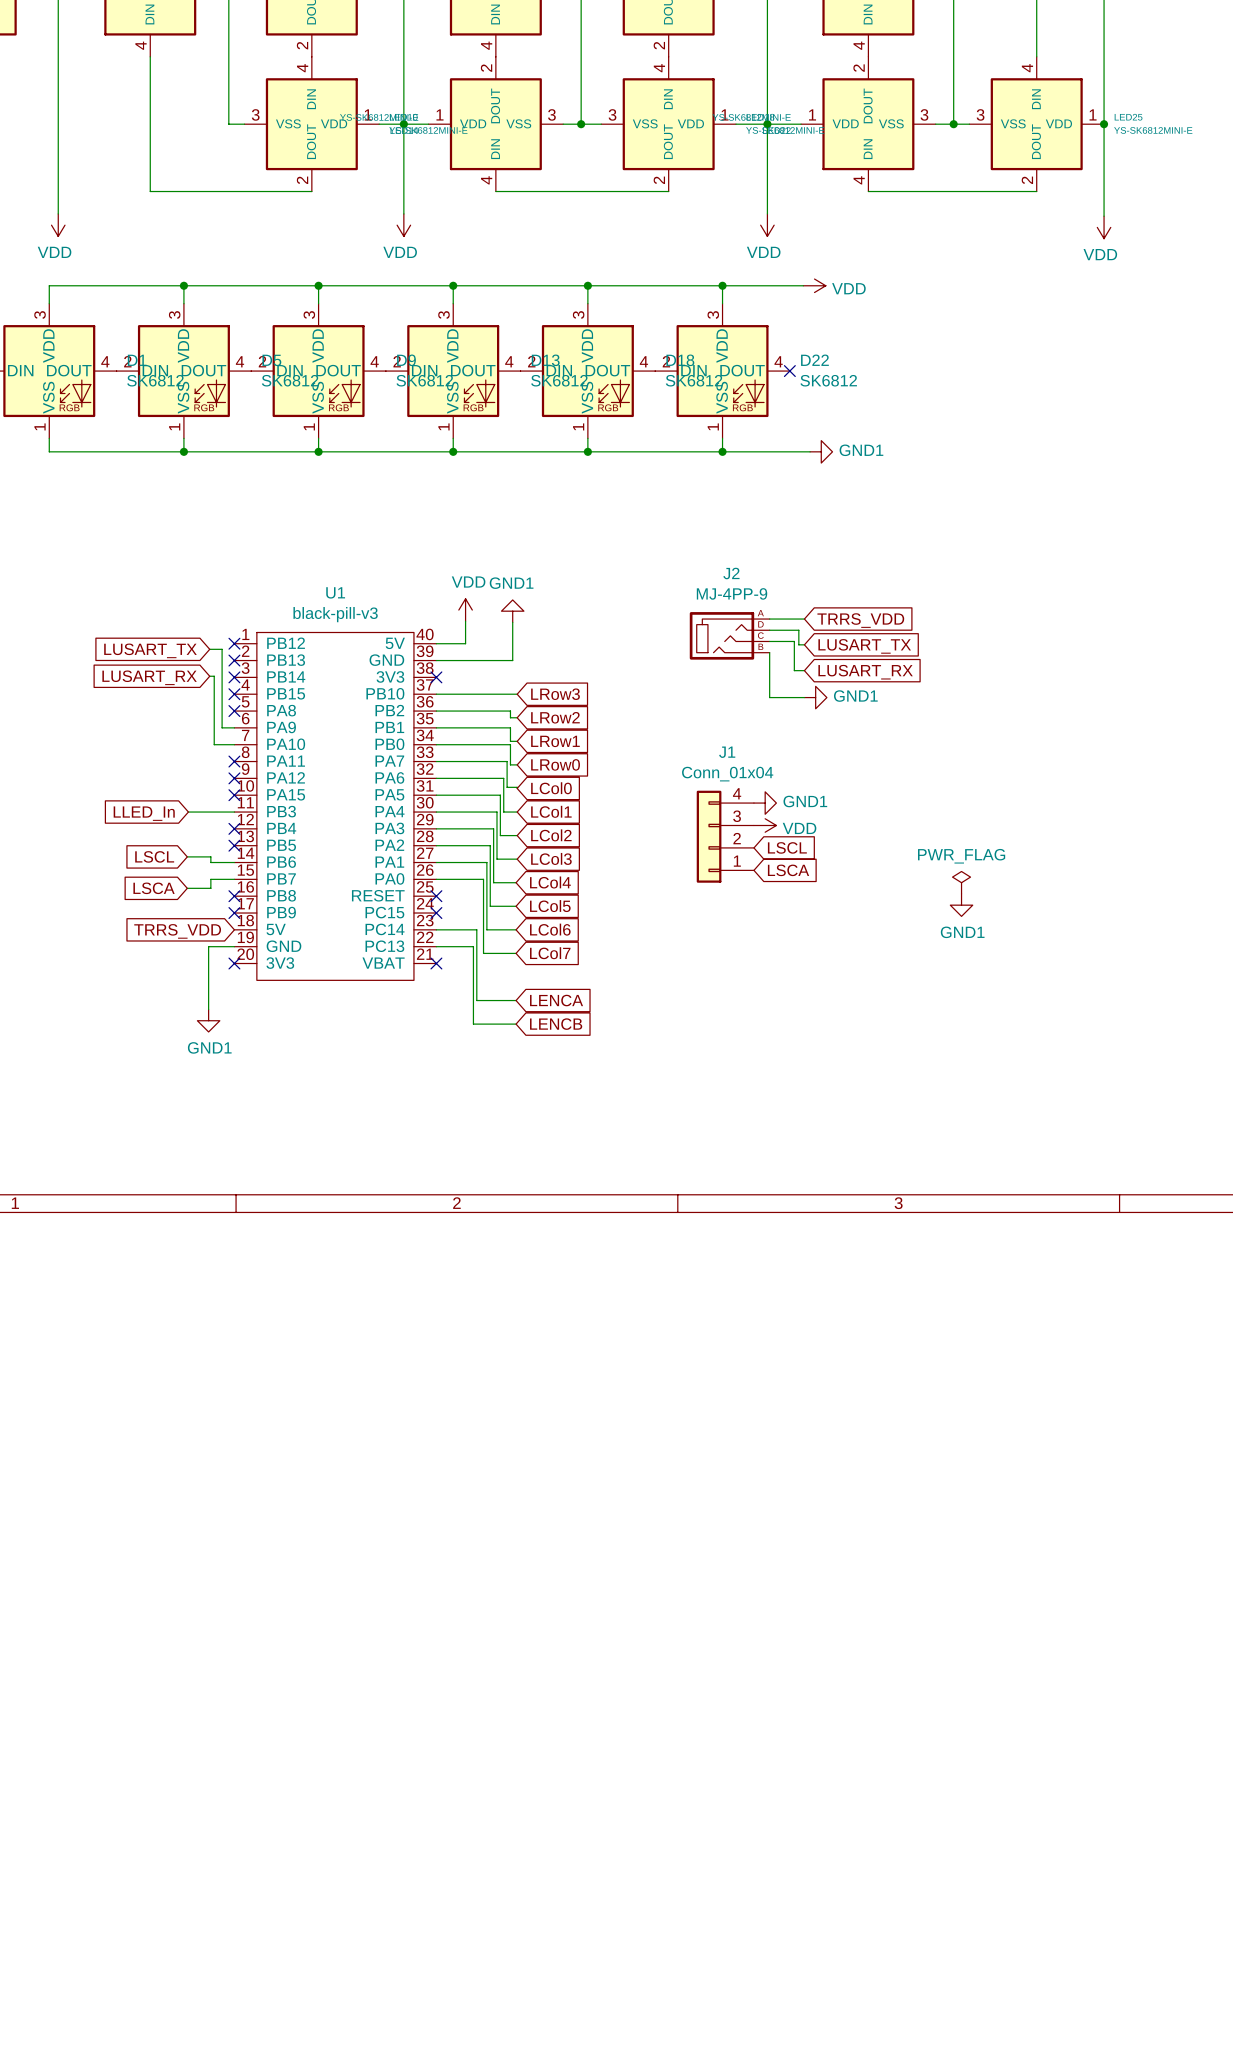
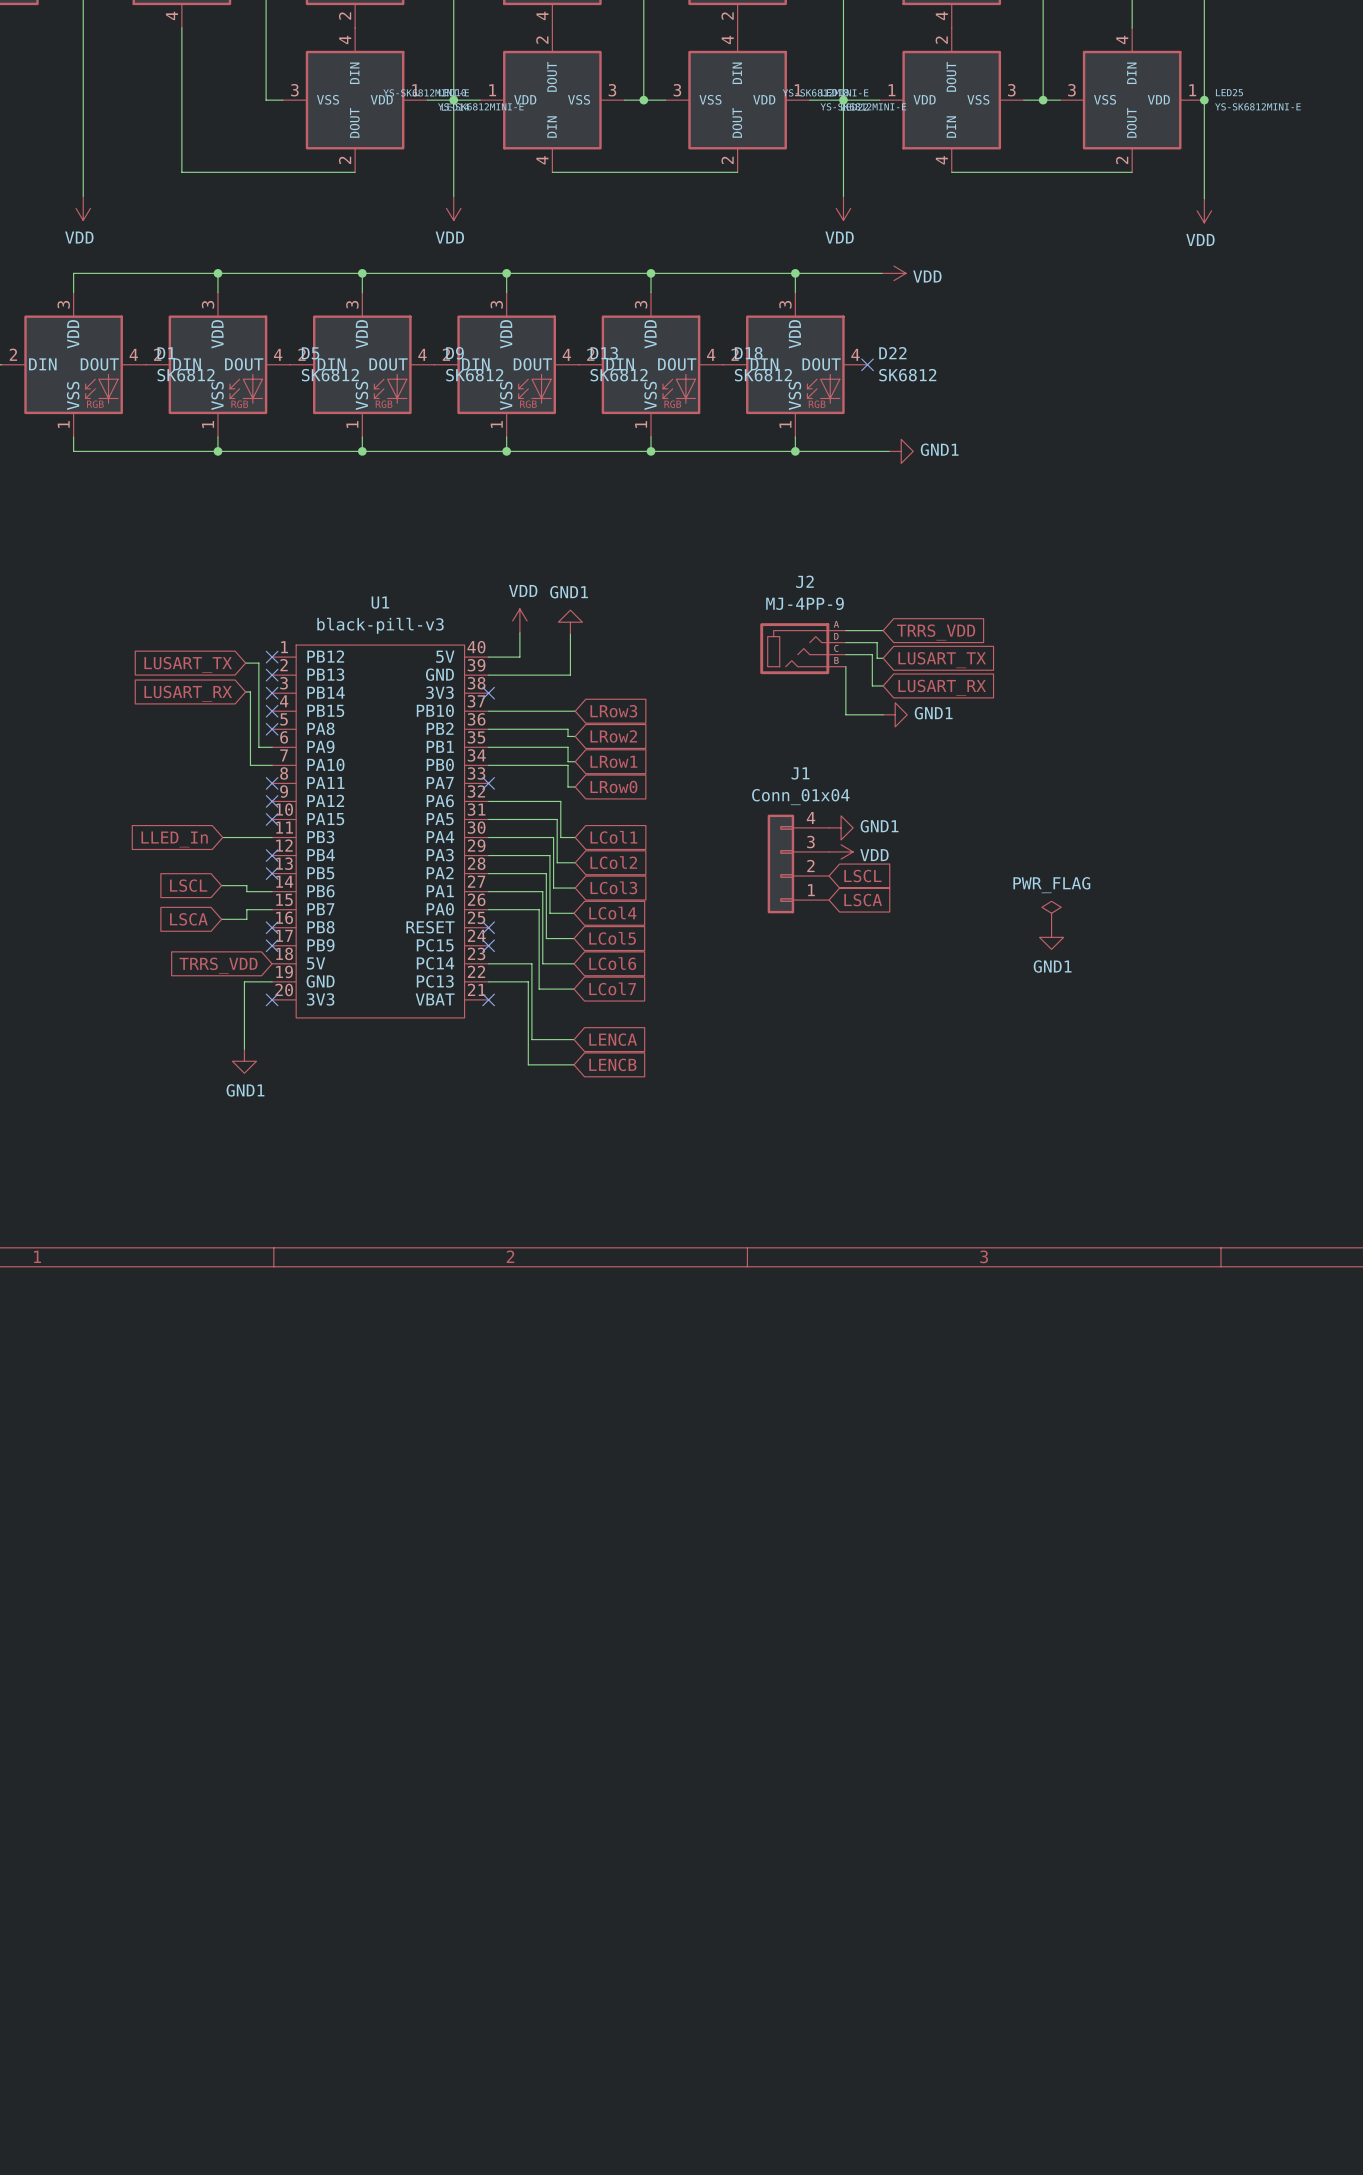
wire: (436, 761) (507, 761) (507, 787) (517, 788) -> none
no-connect mark: none -> (488, 783)
global label: LCol0 (551, 788) -> none

